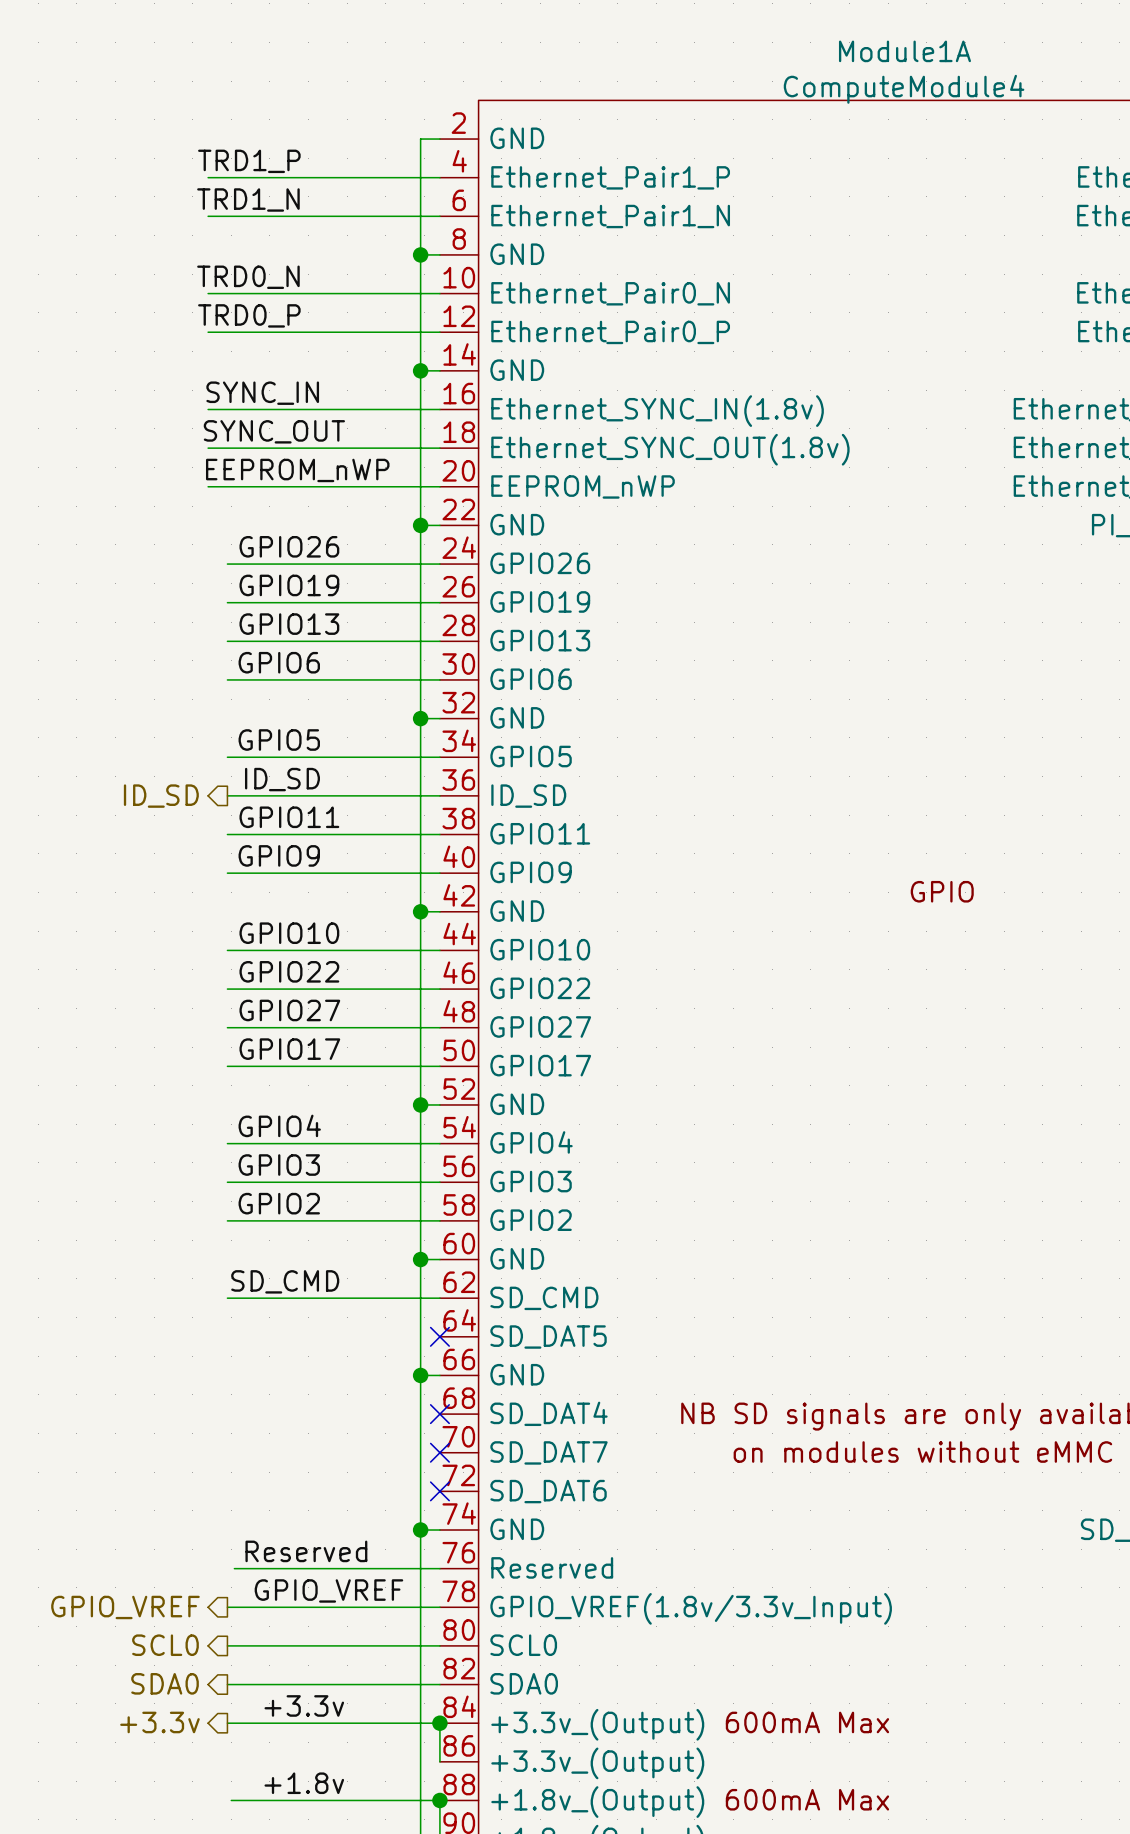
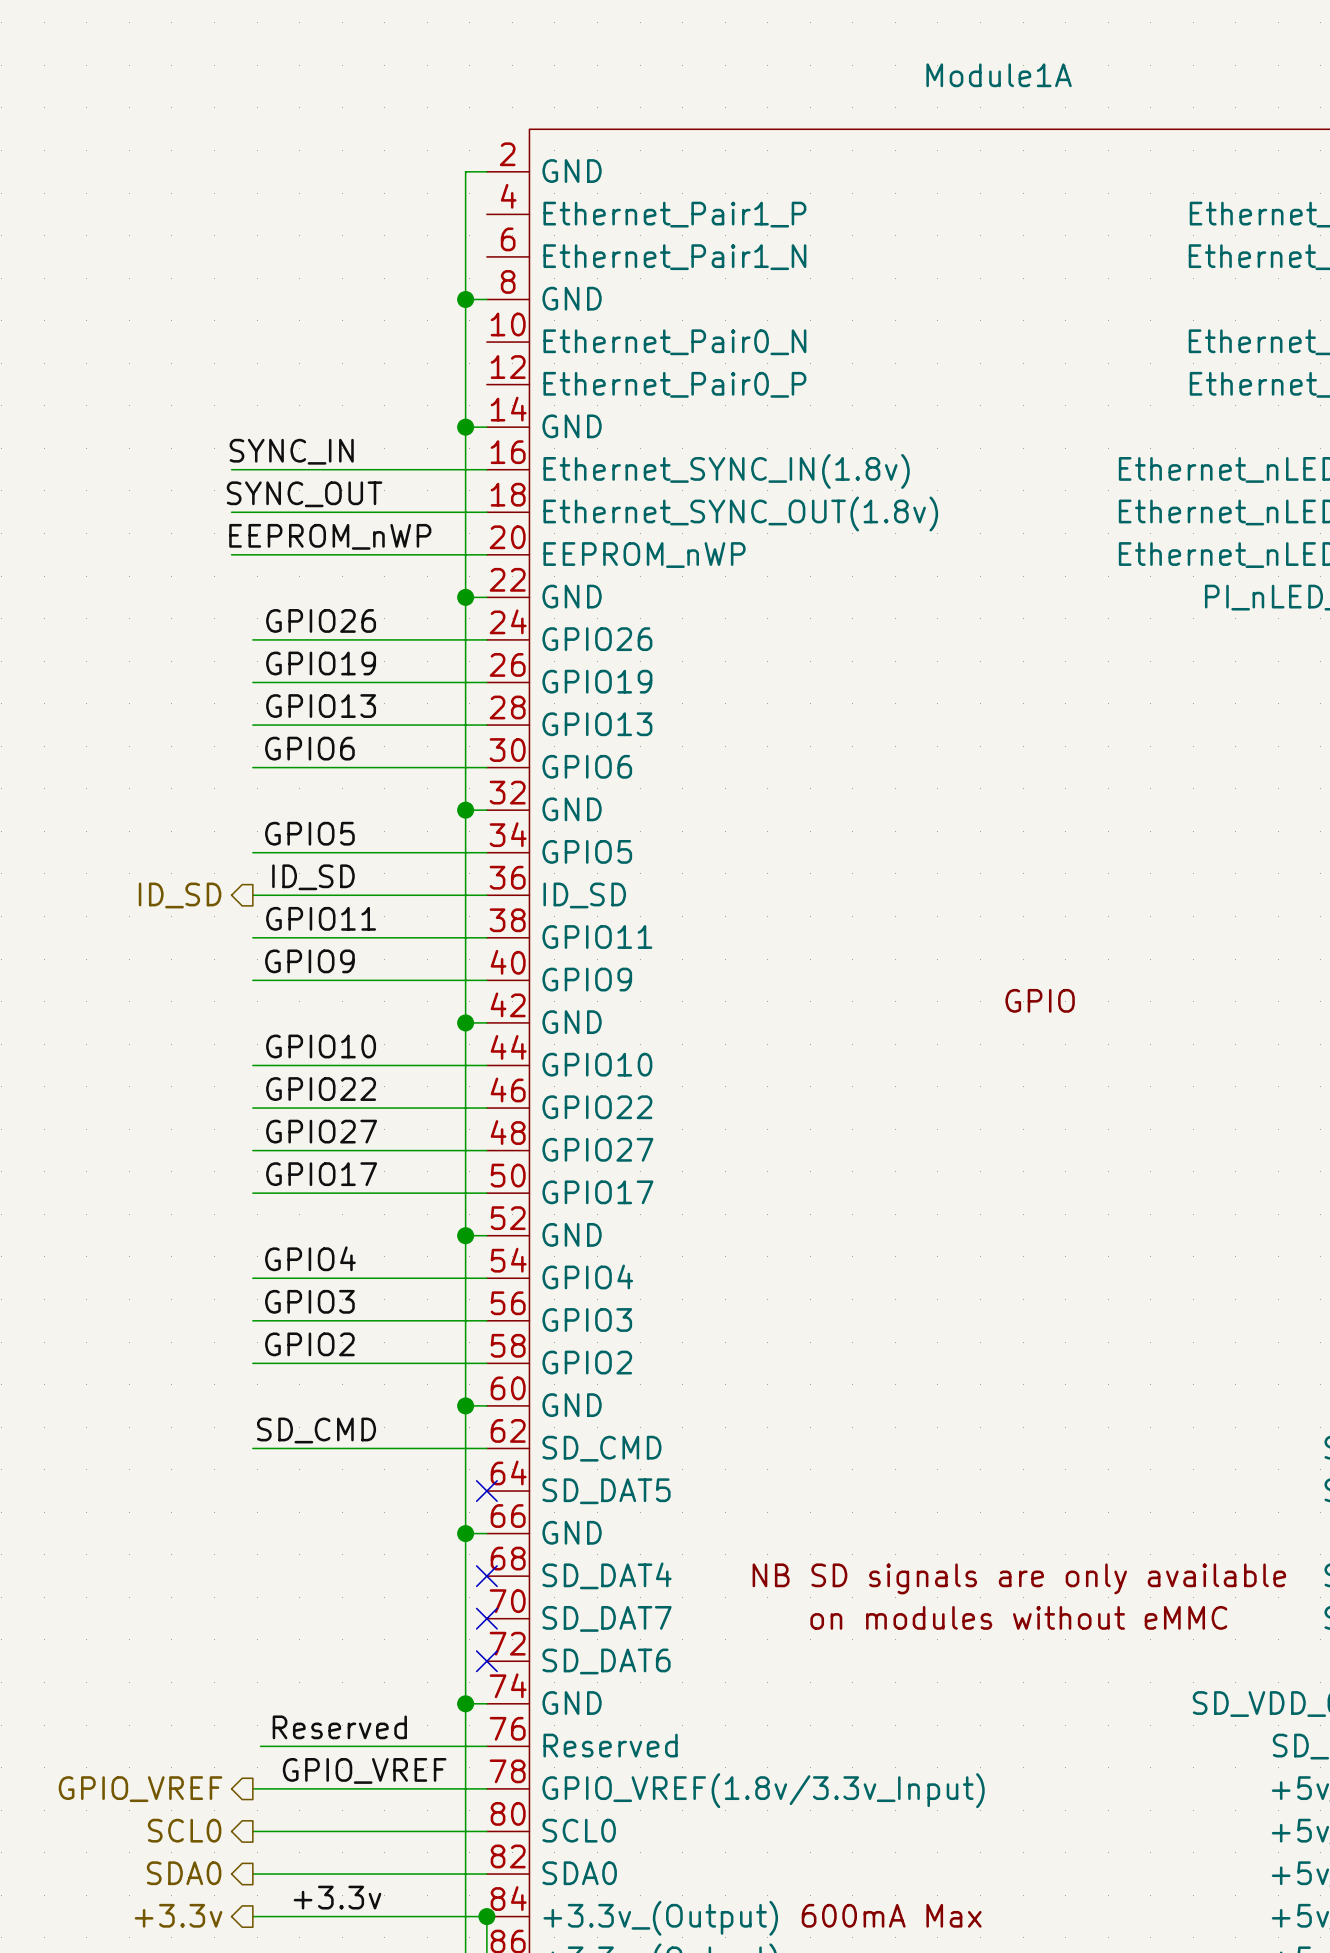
Module1A value: ComputeModule4 (904, 89) -> none
label: TRD1_P (249, 161) -> none
wire: (208, 177) (439, 177) -> none
label: TRD1_N (248, 199) -> none
wire: (208, 216) (439, 216) -> none
label: TRD0_N (248, 277) -> none
wire: (208, 293) (439, 293) -> none
label: TRD0_P (249, 315) -> none
wire: (208, 332) (439, 332) -> none

